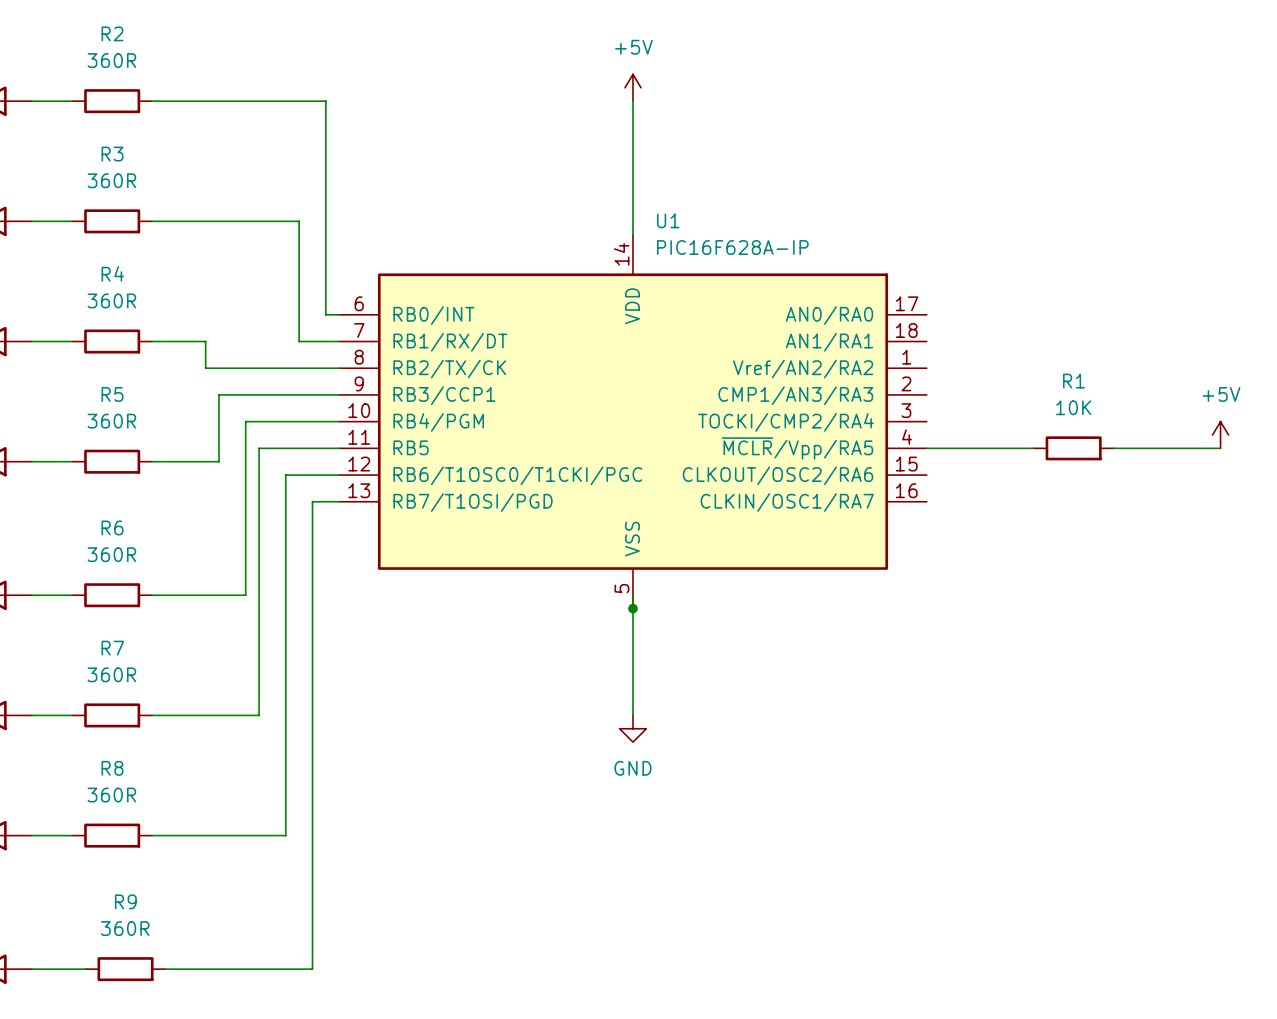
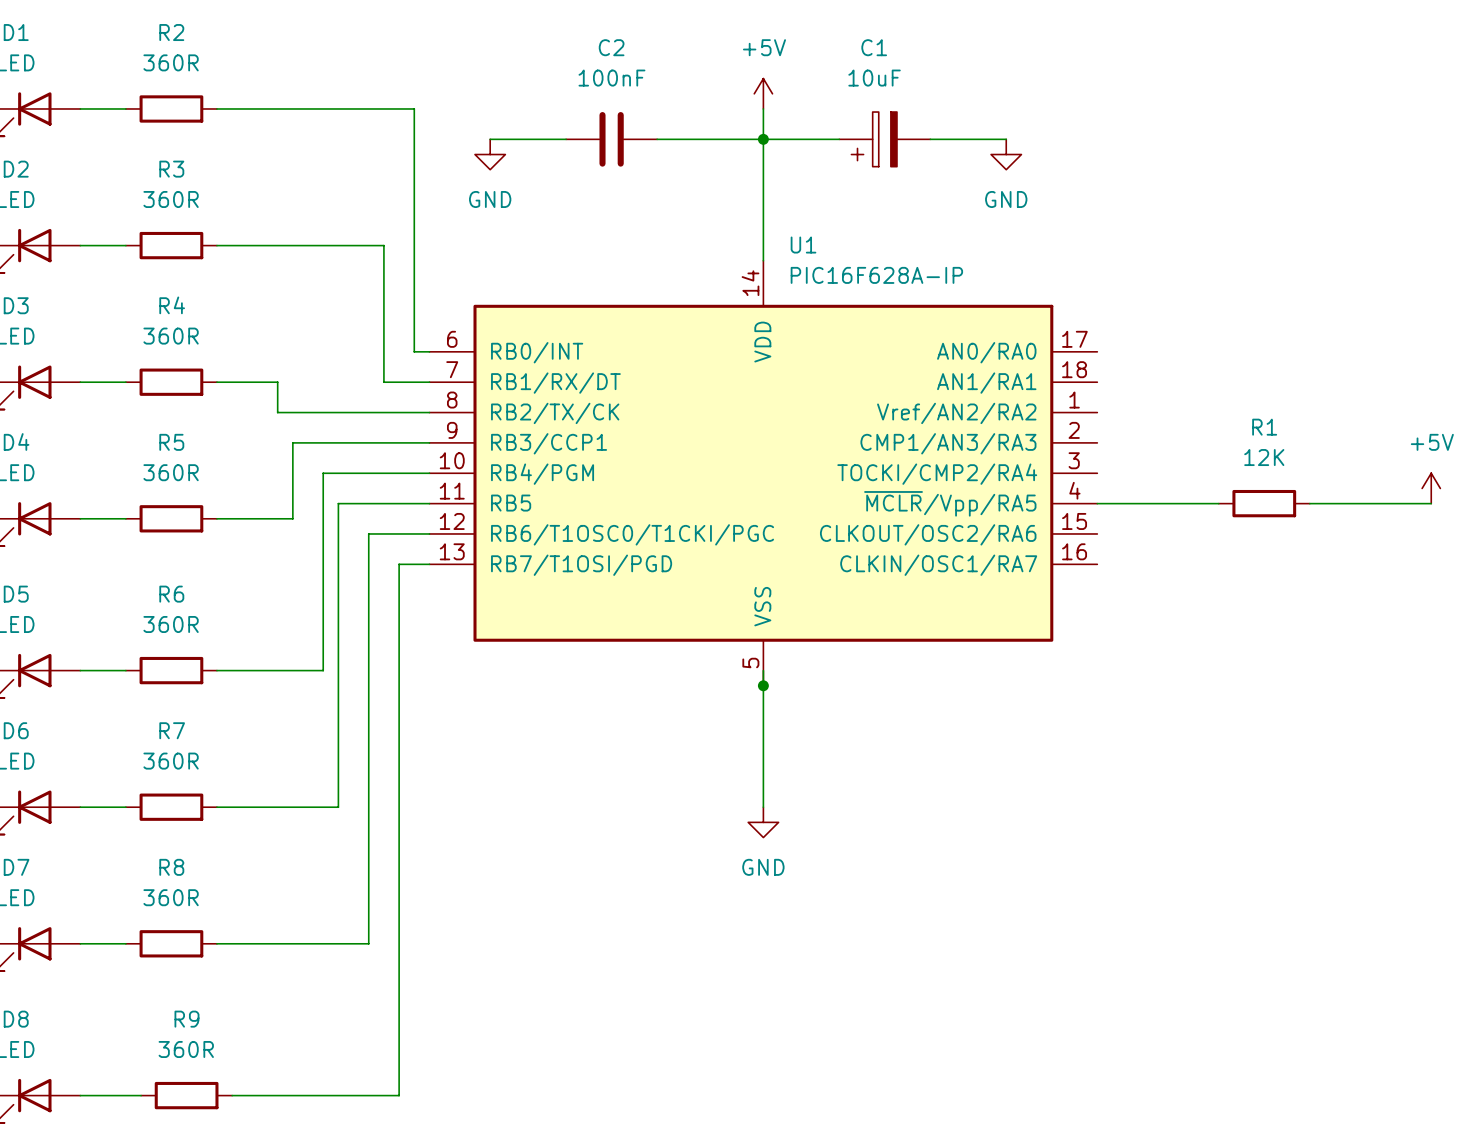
wire: none -> (490, 139) (566, 139)
C2: none -> 100nF (611, 139)
wire: none -> (657, 139) (839, 139)
junction: none -> (763, 139)
C1: none -> 10uF (884, 139)
wire: none -> (930, 139) (1006, 139)
power symbol: none -> GND (490, 154)
power symbol: none -> GND (1006, 154)
R1 value: 10K (1073, 407) -> 12K (1264, 457)

